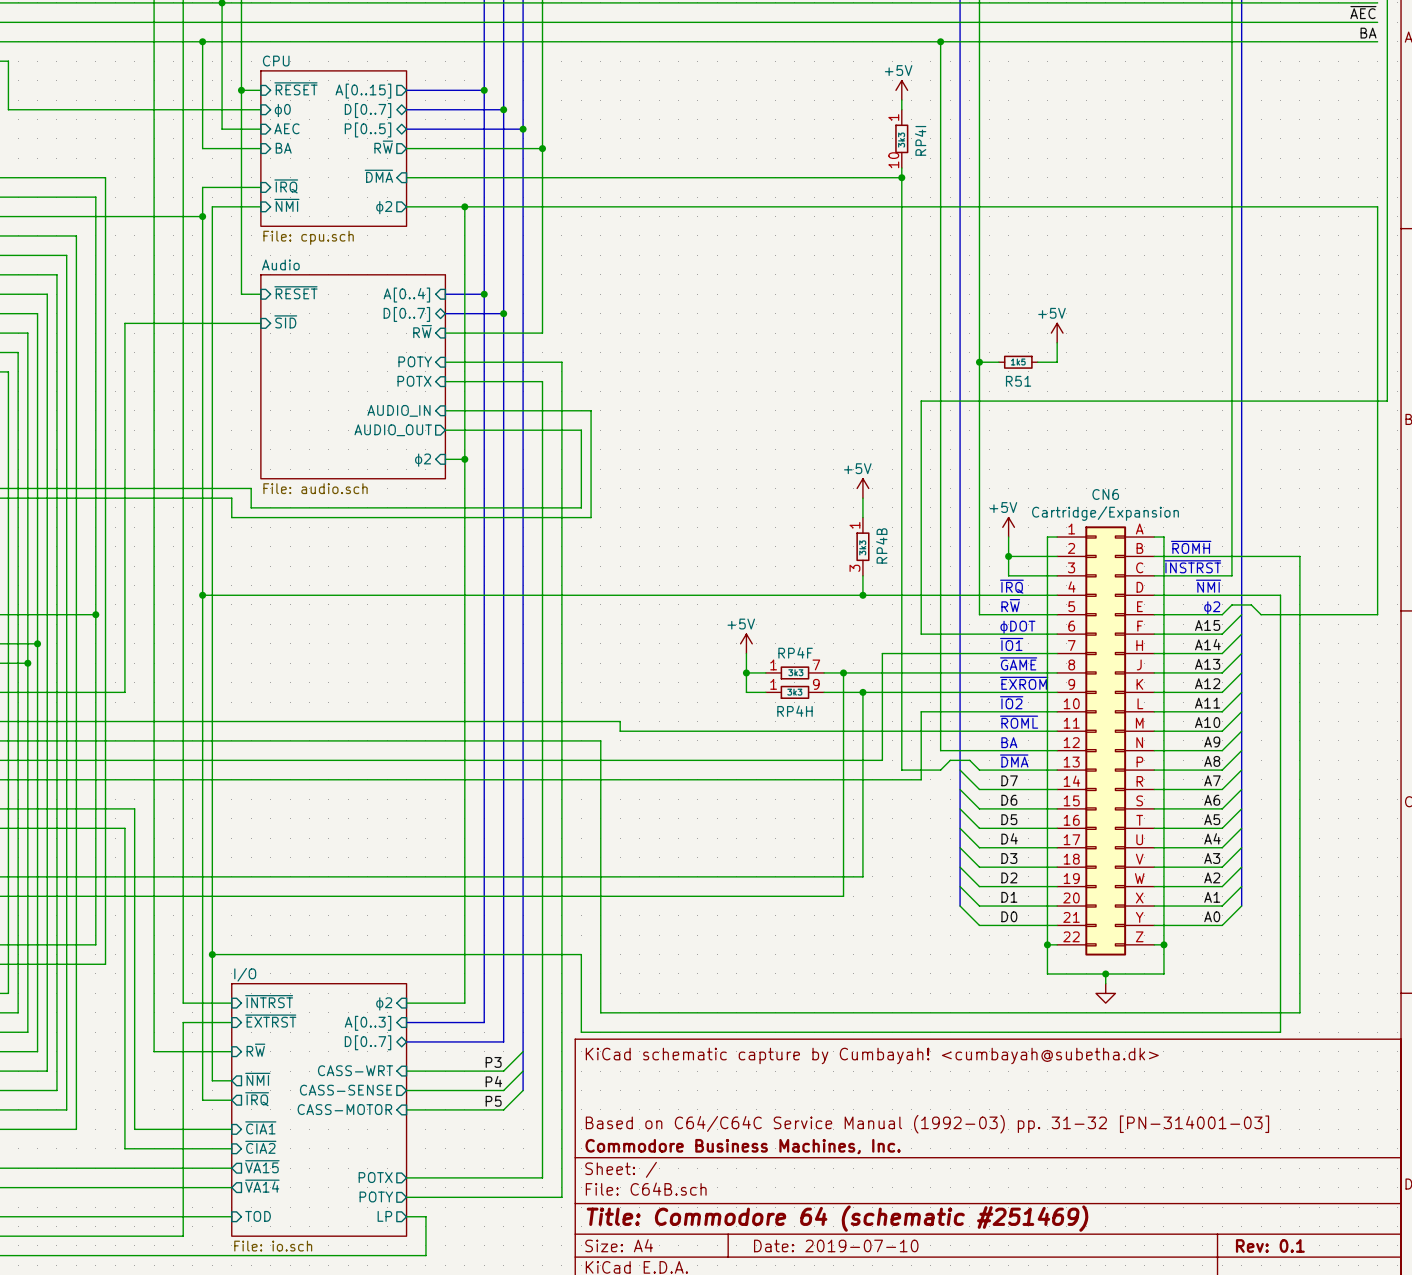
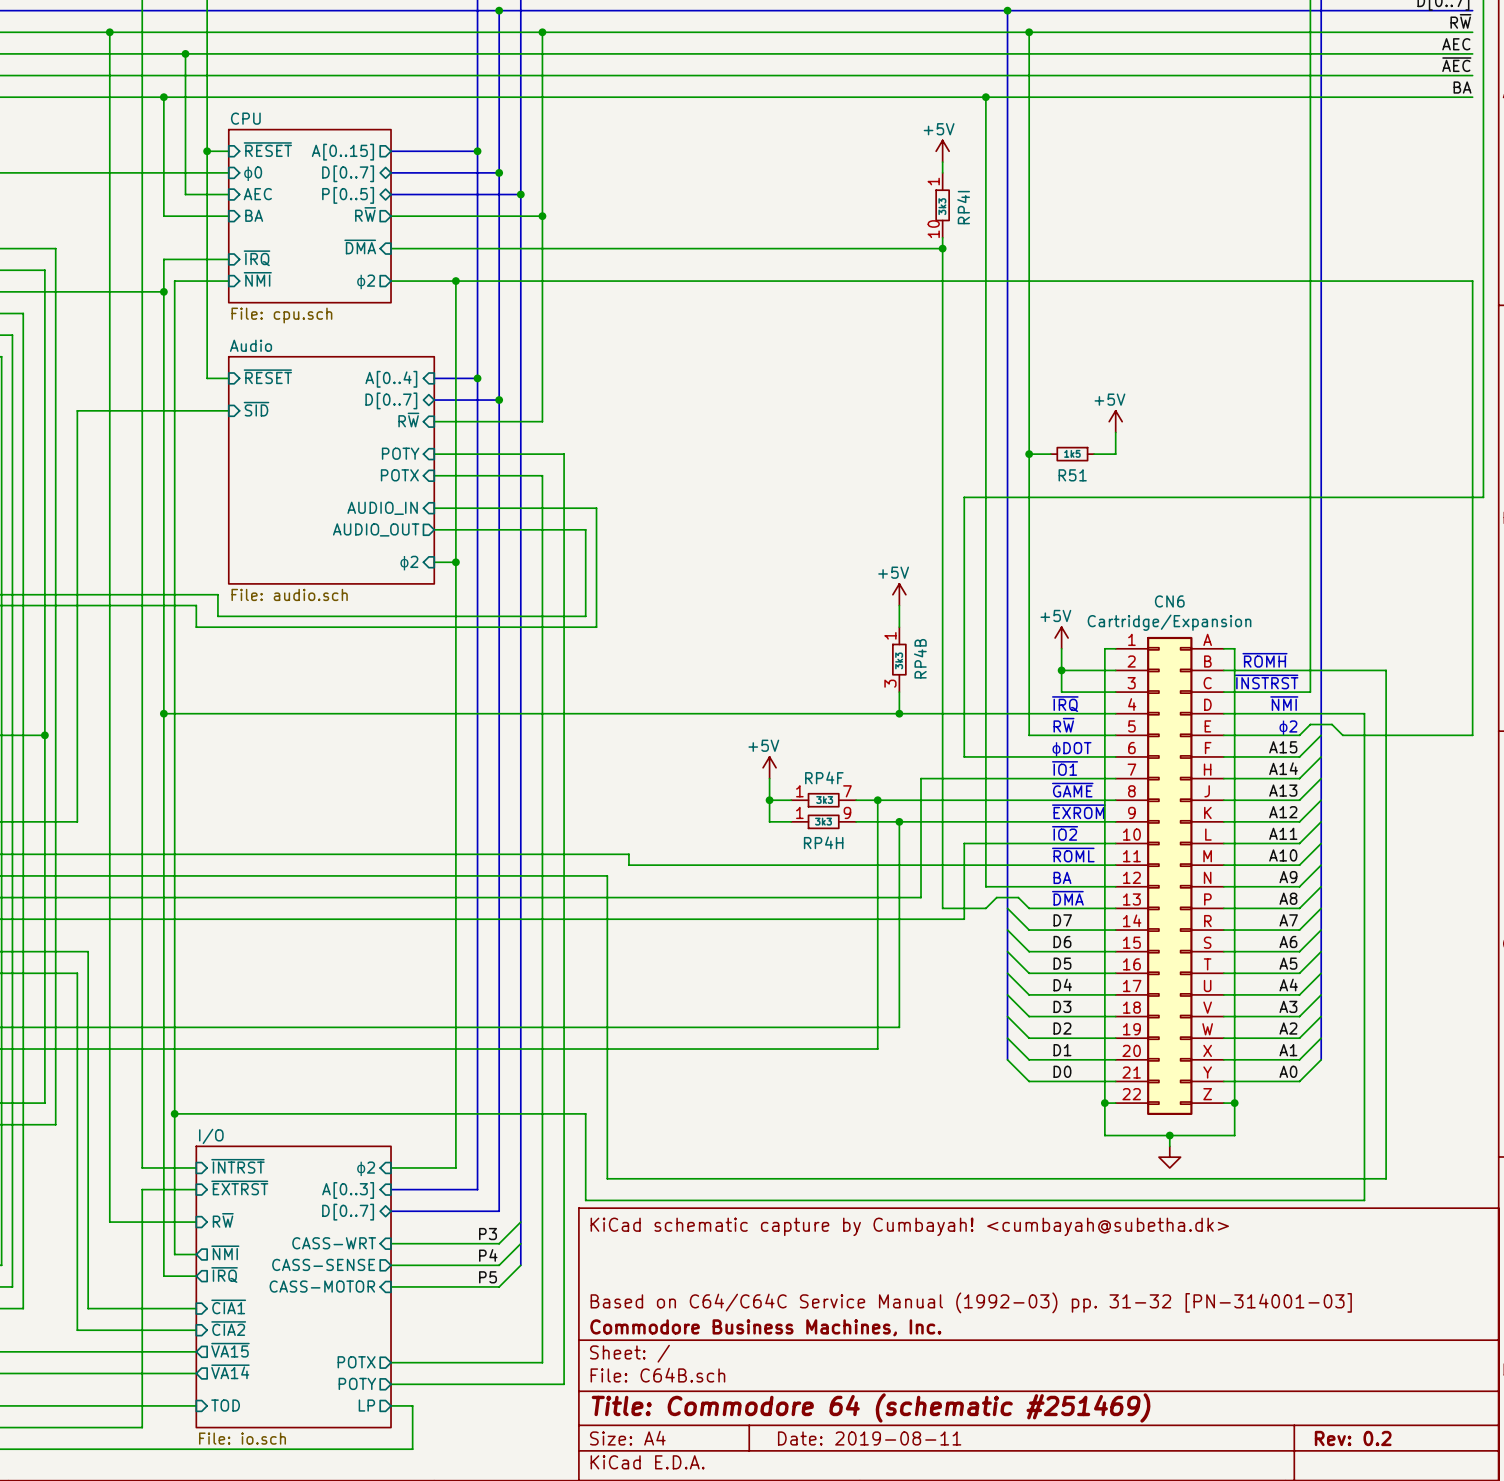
title block: Date: 2019-07-10 (836, 1245) -> Date: 2019-08-11 (869, 1438)
title block: Rev: 0.1 (1270, 1245) -> Rev: 0.2 (1353, 1438)

